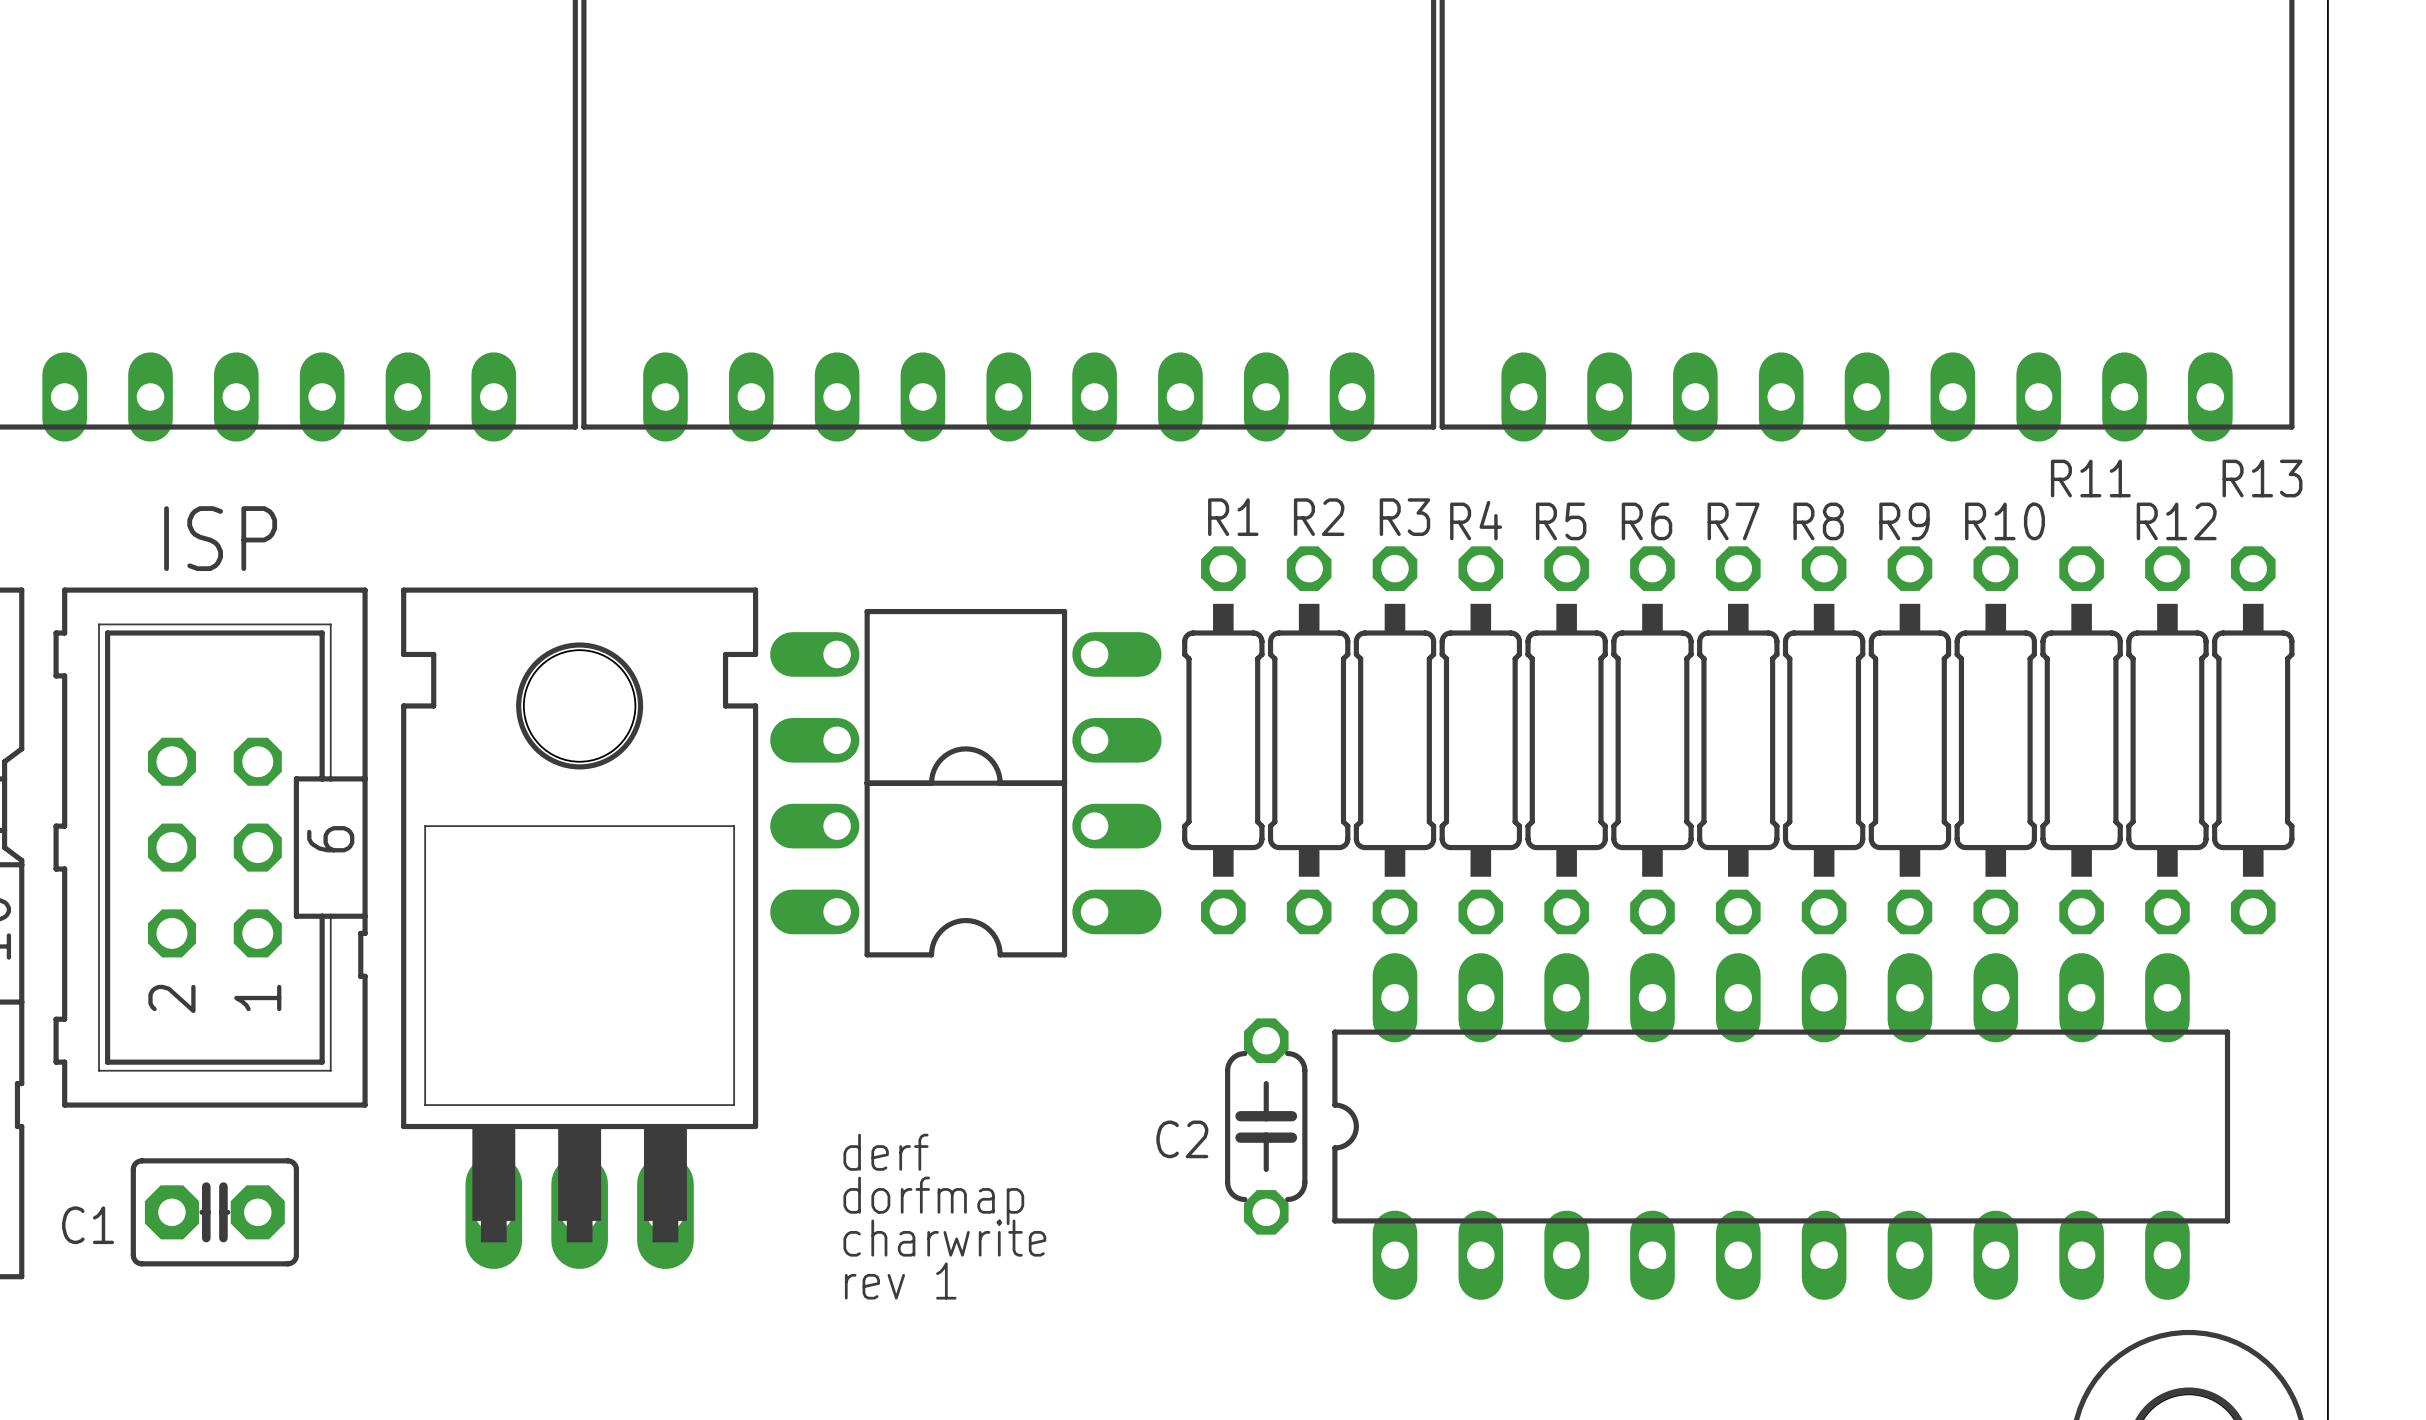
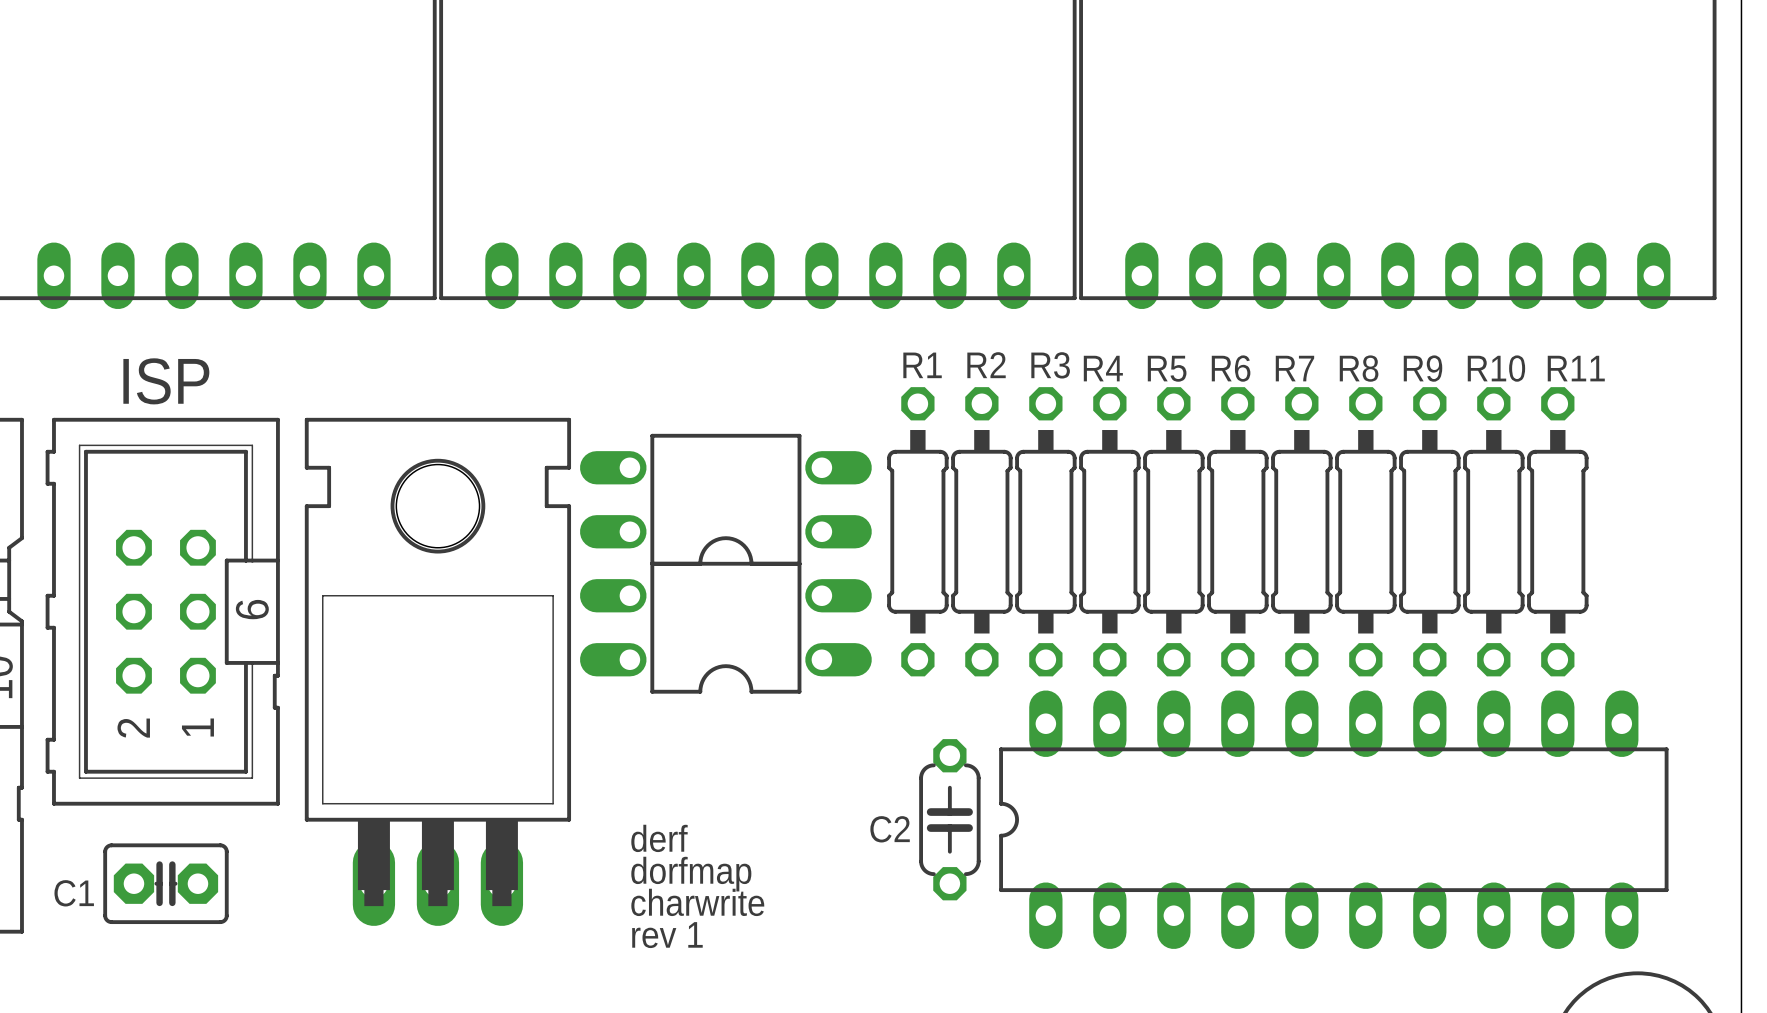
R11 name position: R11 (2090, 478) -> R11 (1576, 368)
R12: (2167, 740) -> none
R13: (2253, 740) -> none

